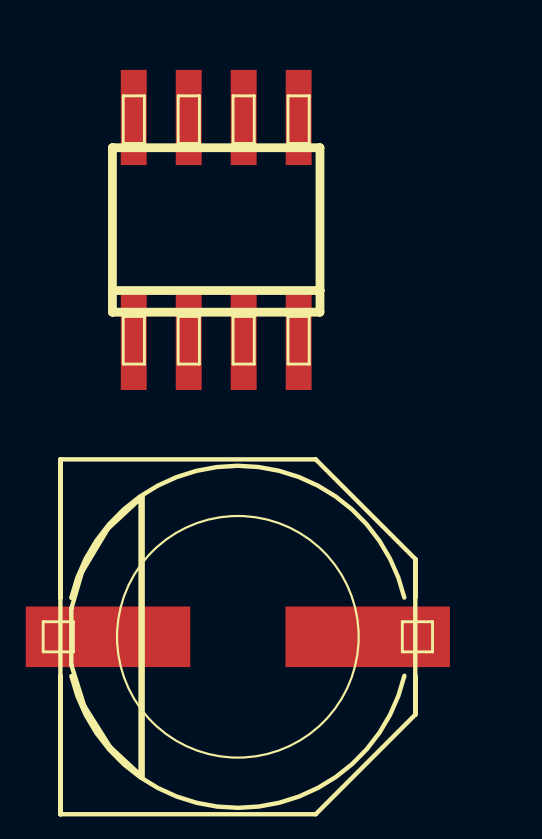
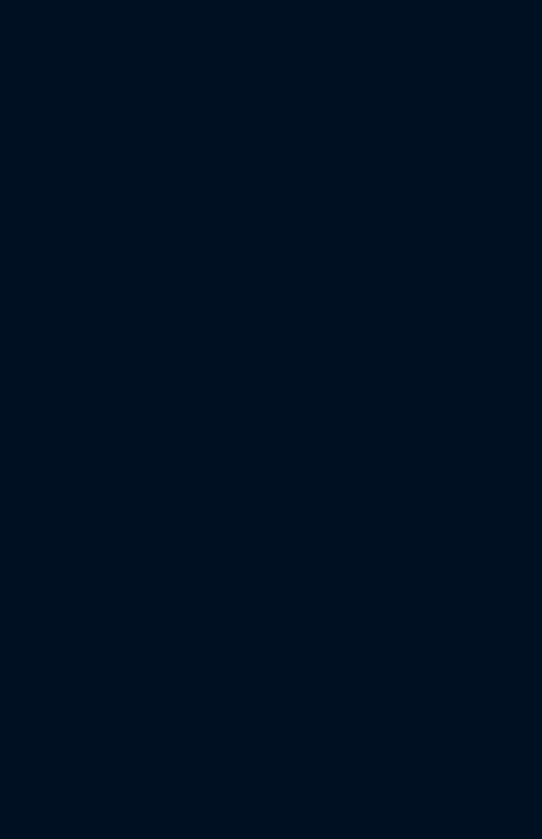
part: (216, 229) -> none
part: (237, 636) -> none

